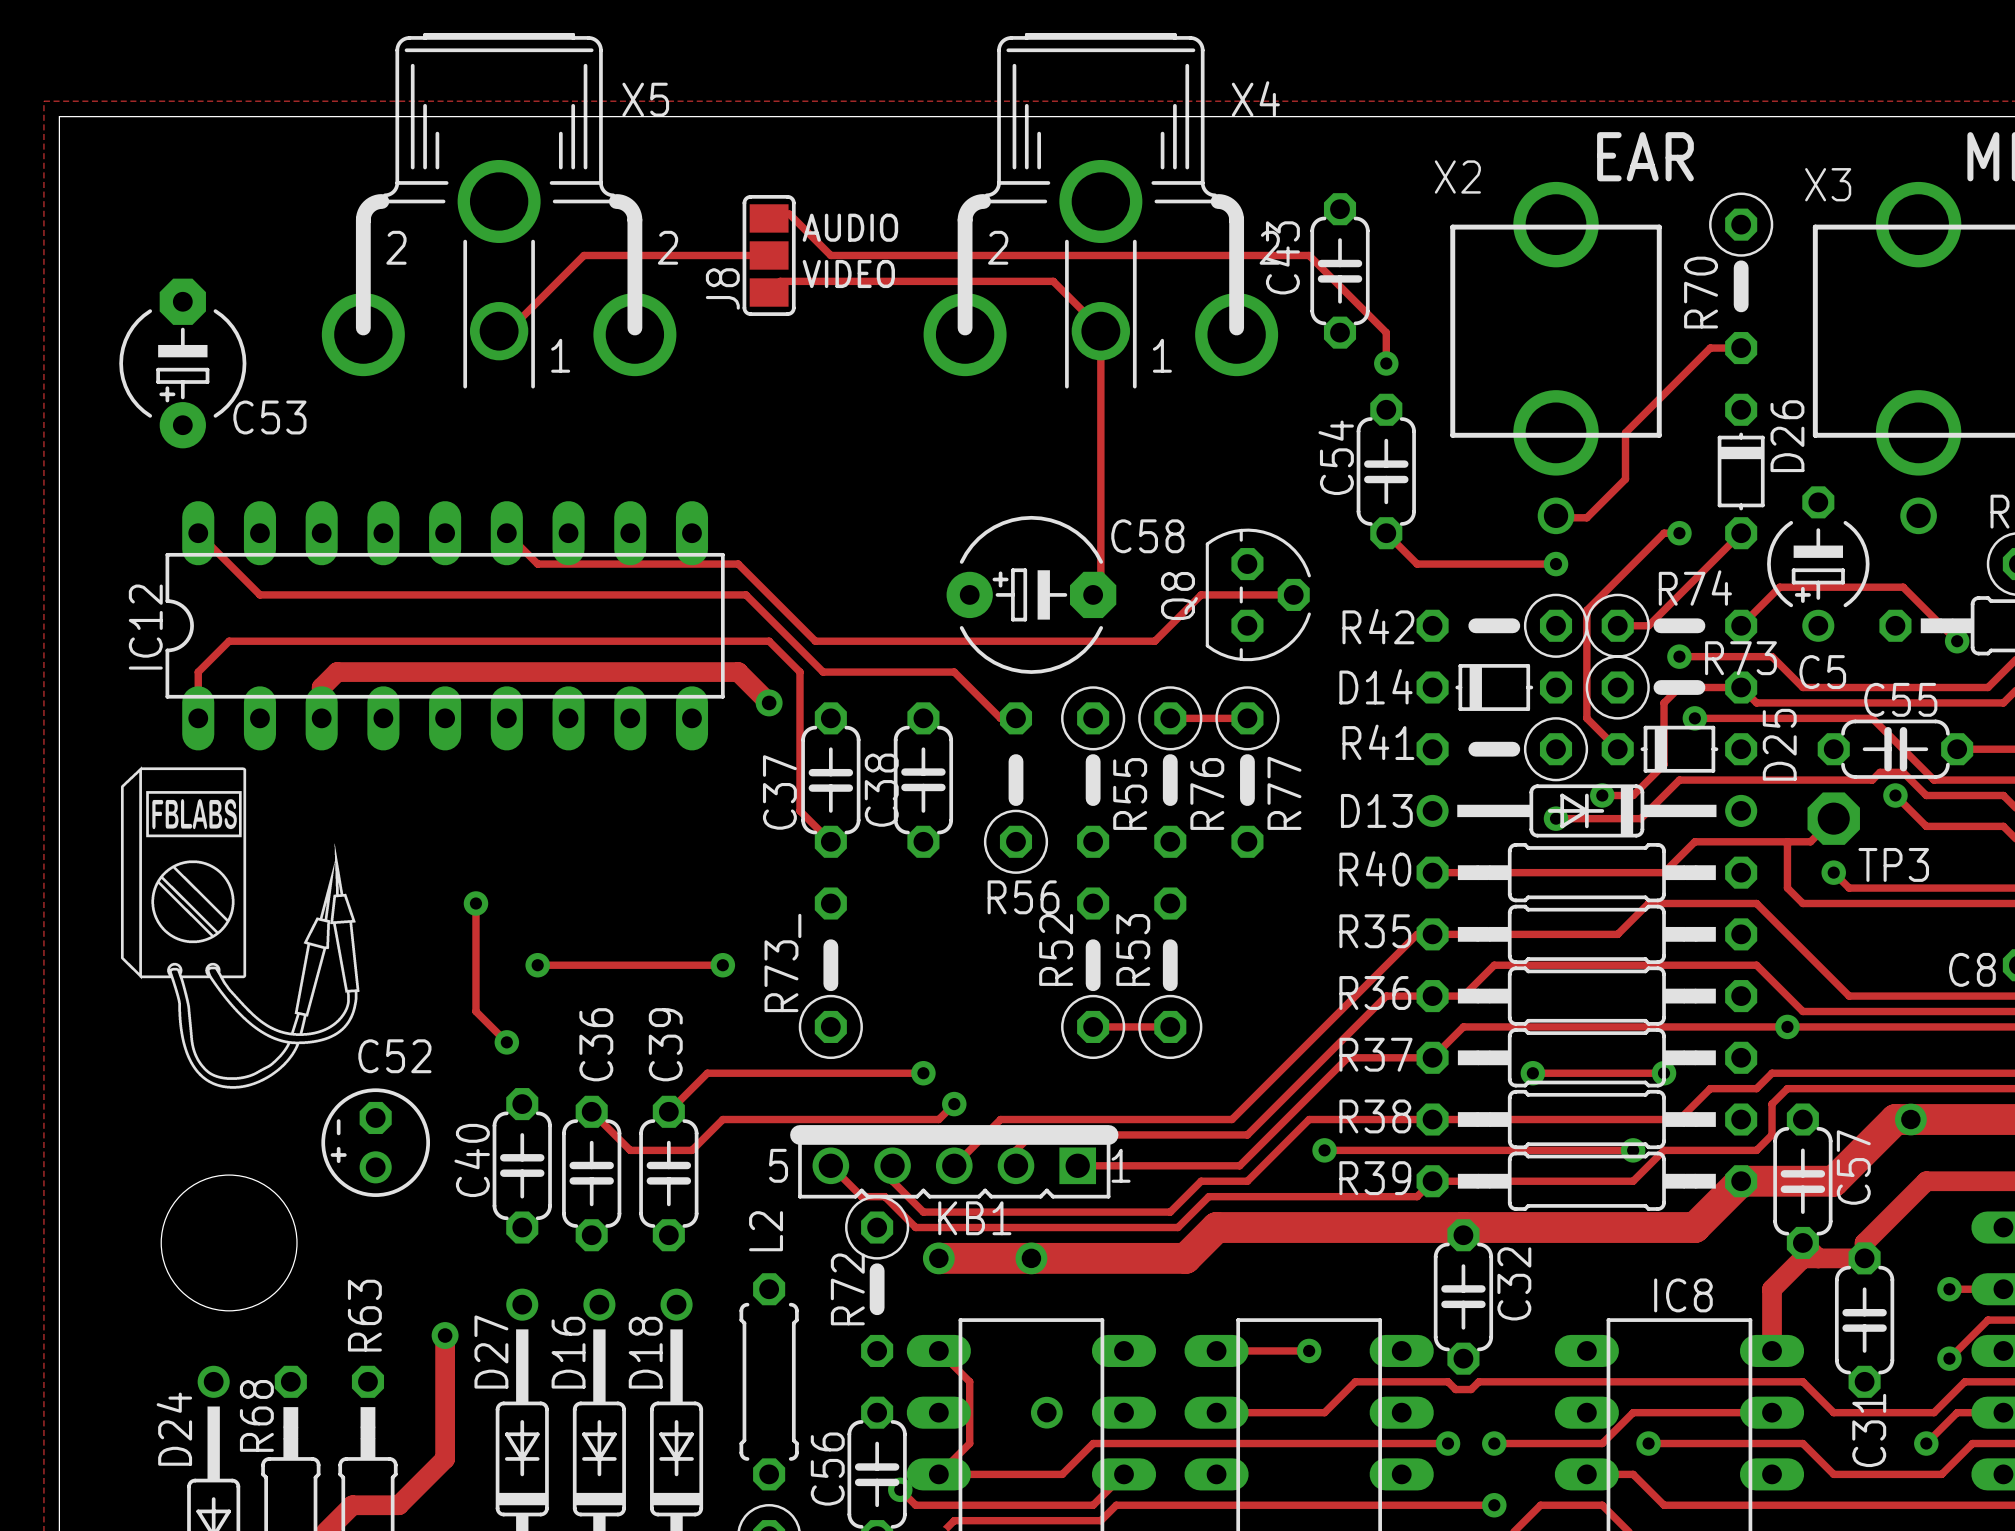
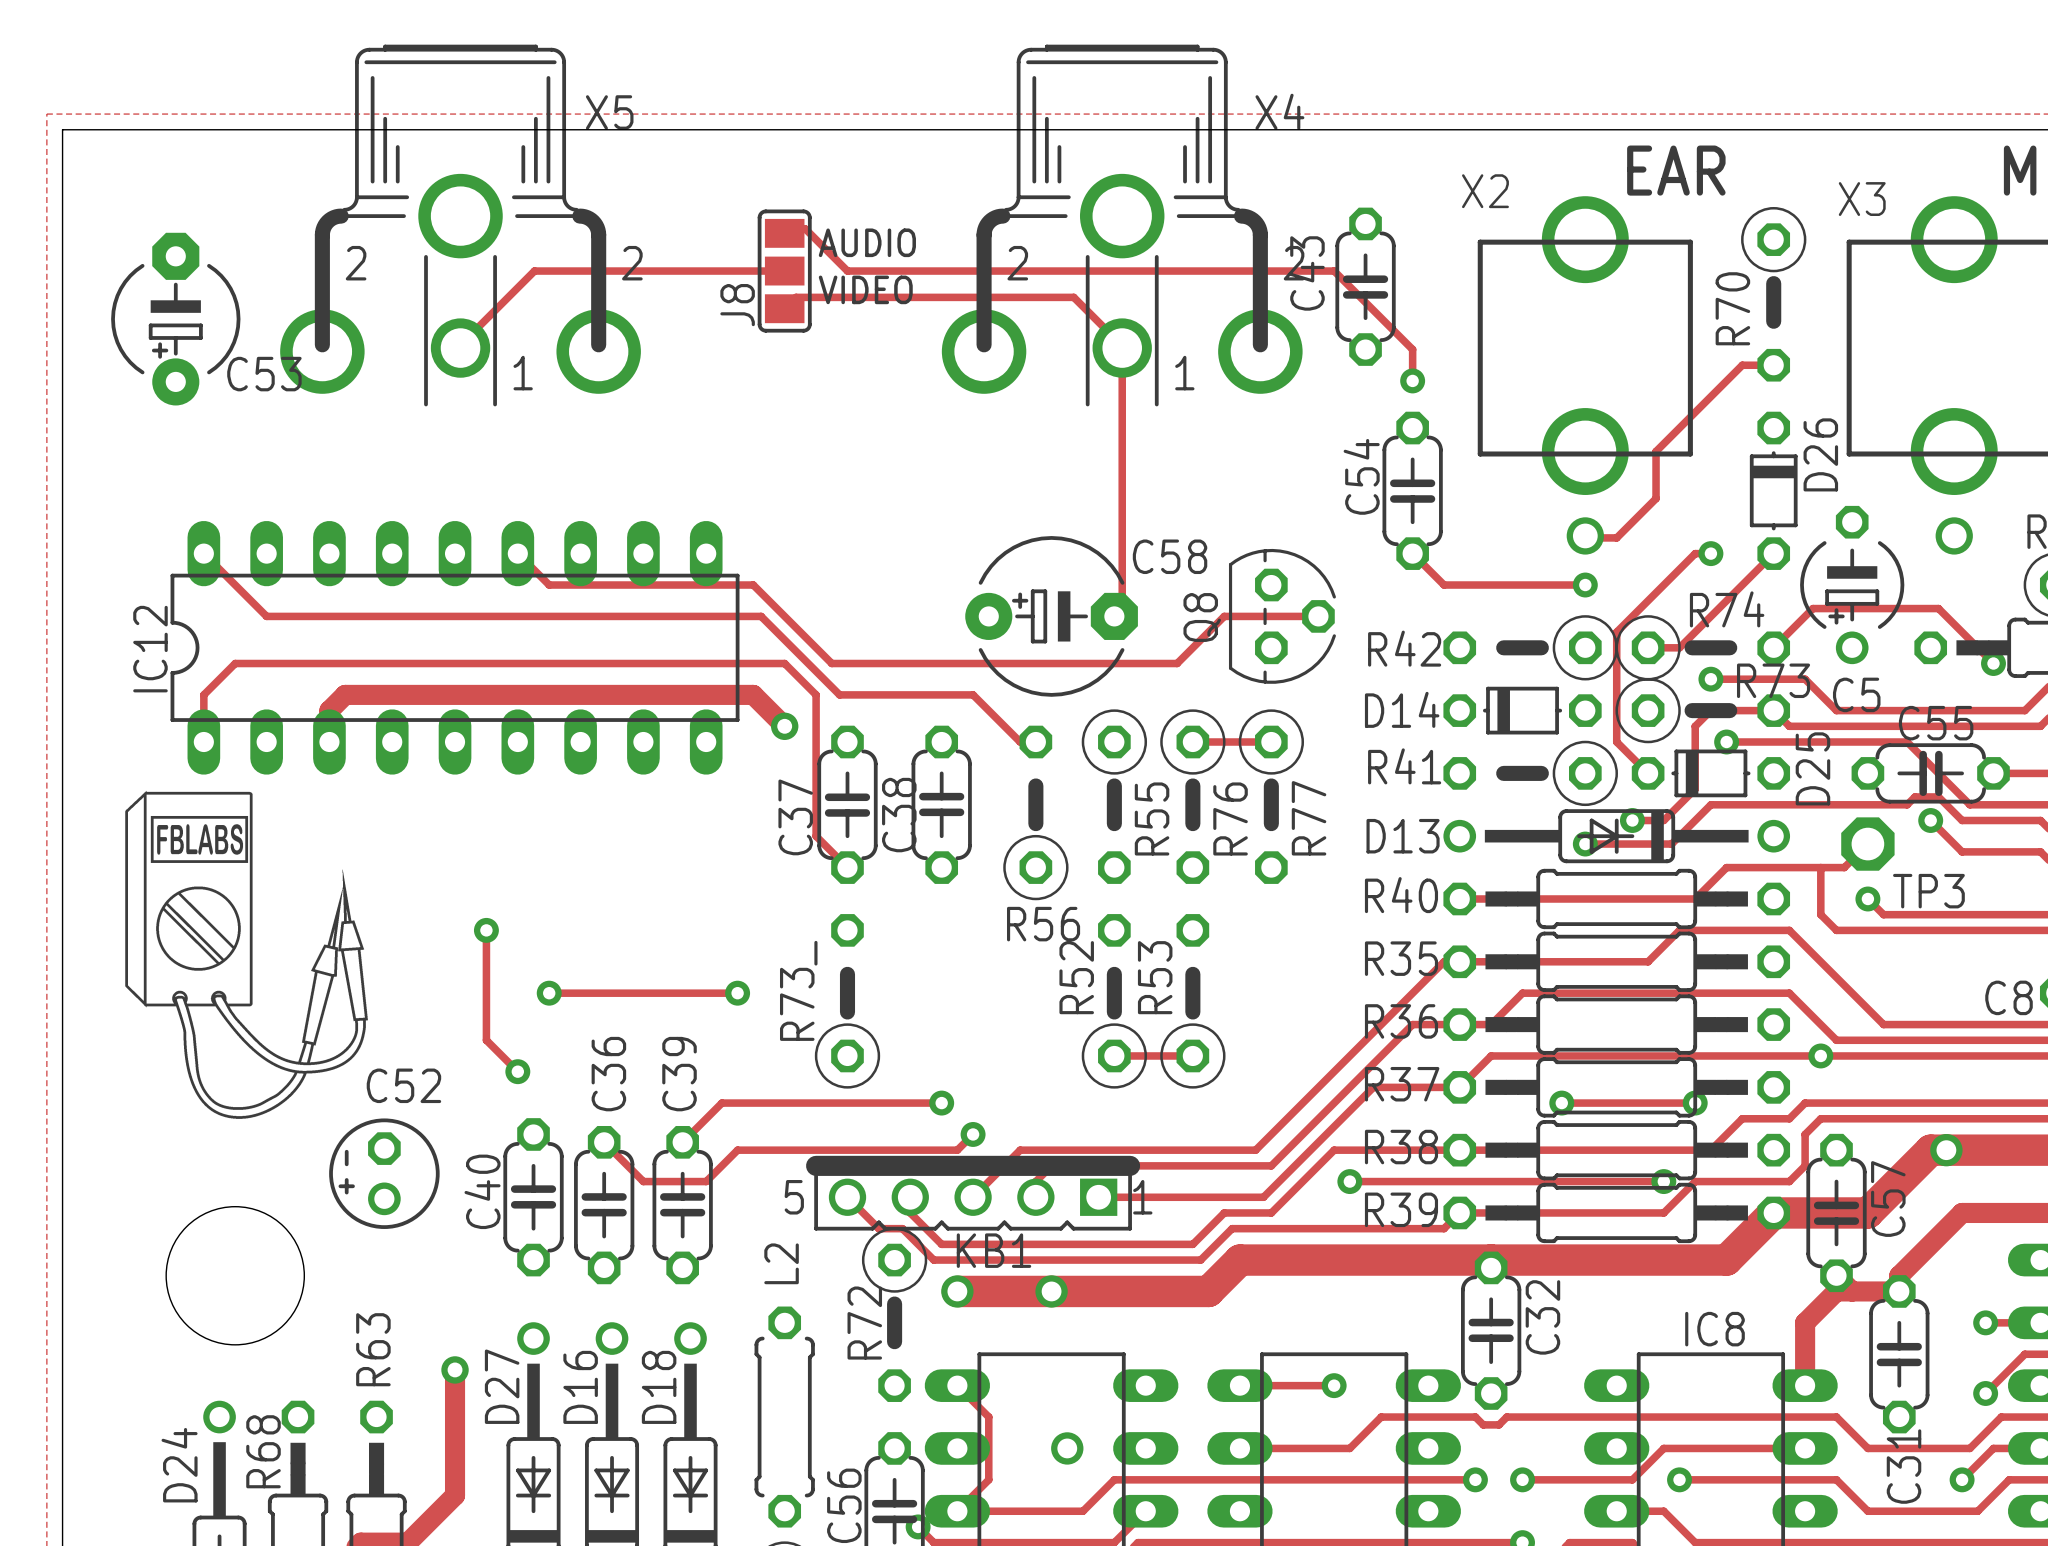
X5 position: (499, 210) -> (460, 225)
track: (583, 255) (508, 331) (499, 331) -> (596, 271) (534, 271) (460, 345) (460, 348)
C53 position: (182, 363) -> (175, 319)

